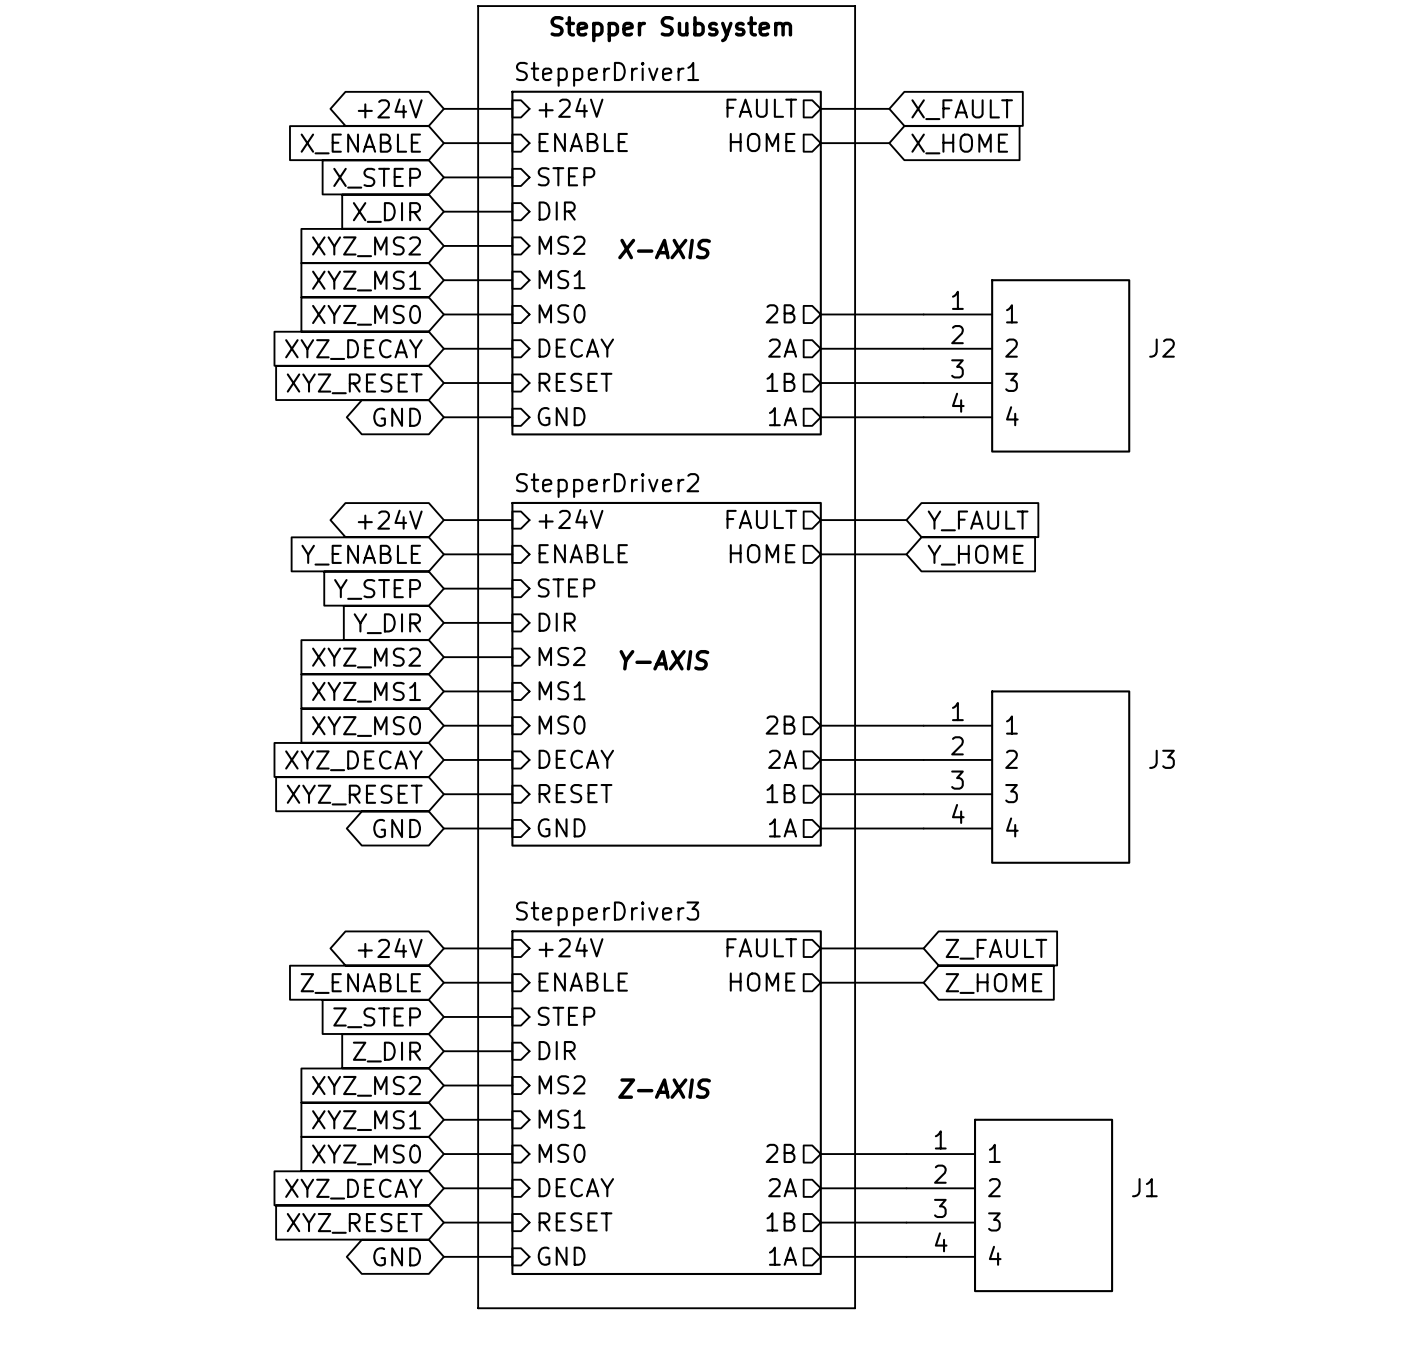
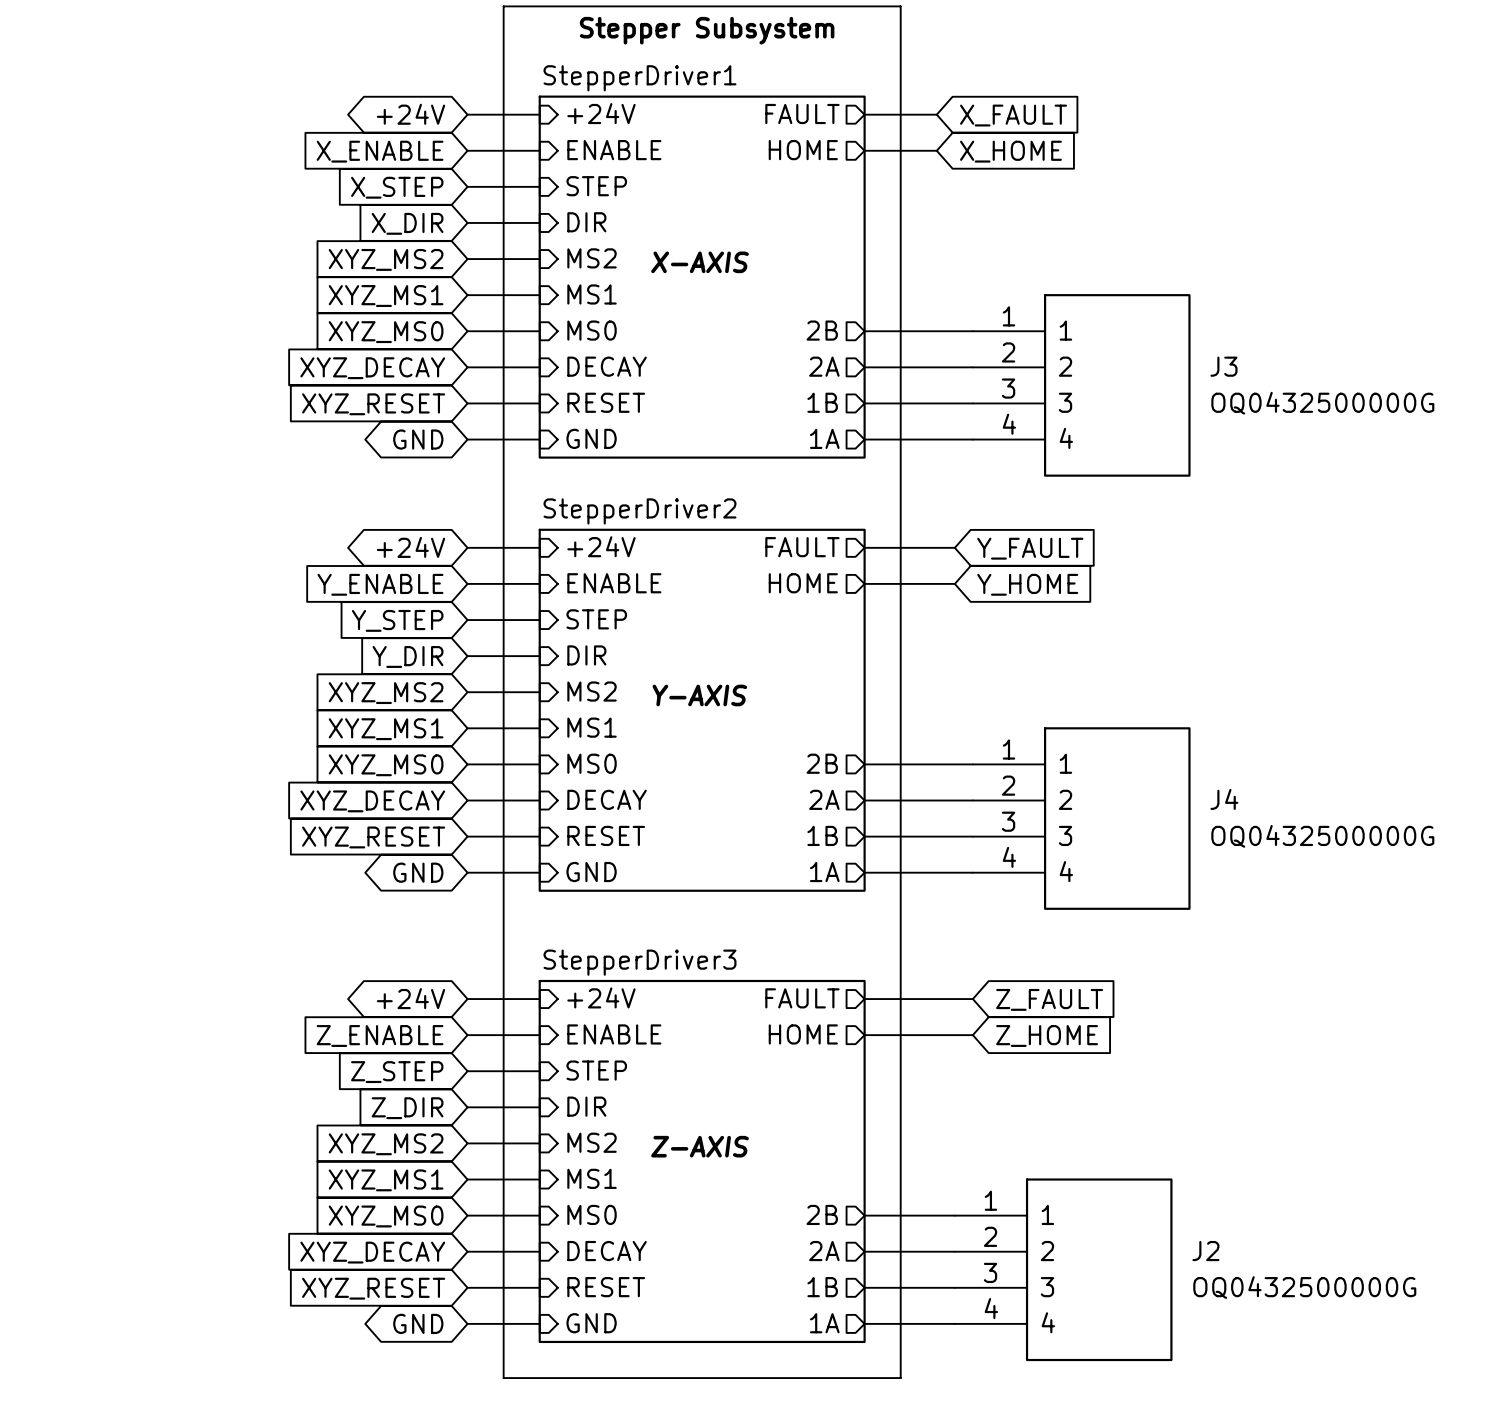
J2 name: J2 (1161, 348) -> J3 (1223, 366)
J2 value: none -> OQ0432500000G (1322, 403)
J3 name: J3 (1161, 759) -> J4 (1224, 799)
J3 value: none -> OQ0432500000G (1322, 836)
J1 name: J1 (1144, 1187) -> J2 (1205, 1251)
J1 value: none -> OQ0432500000G (1304, 1287)

